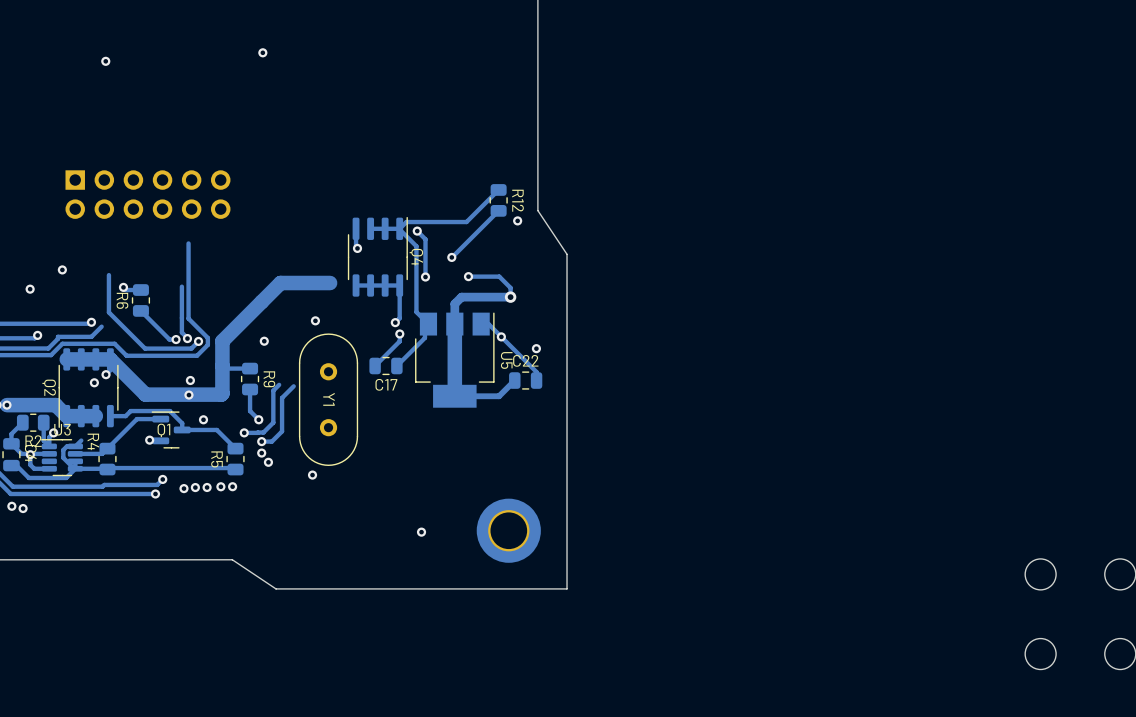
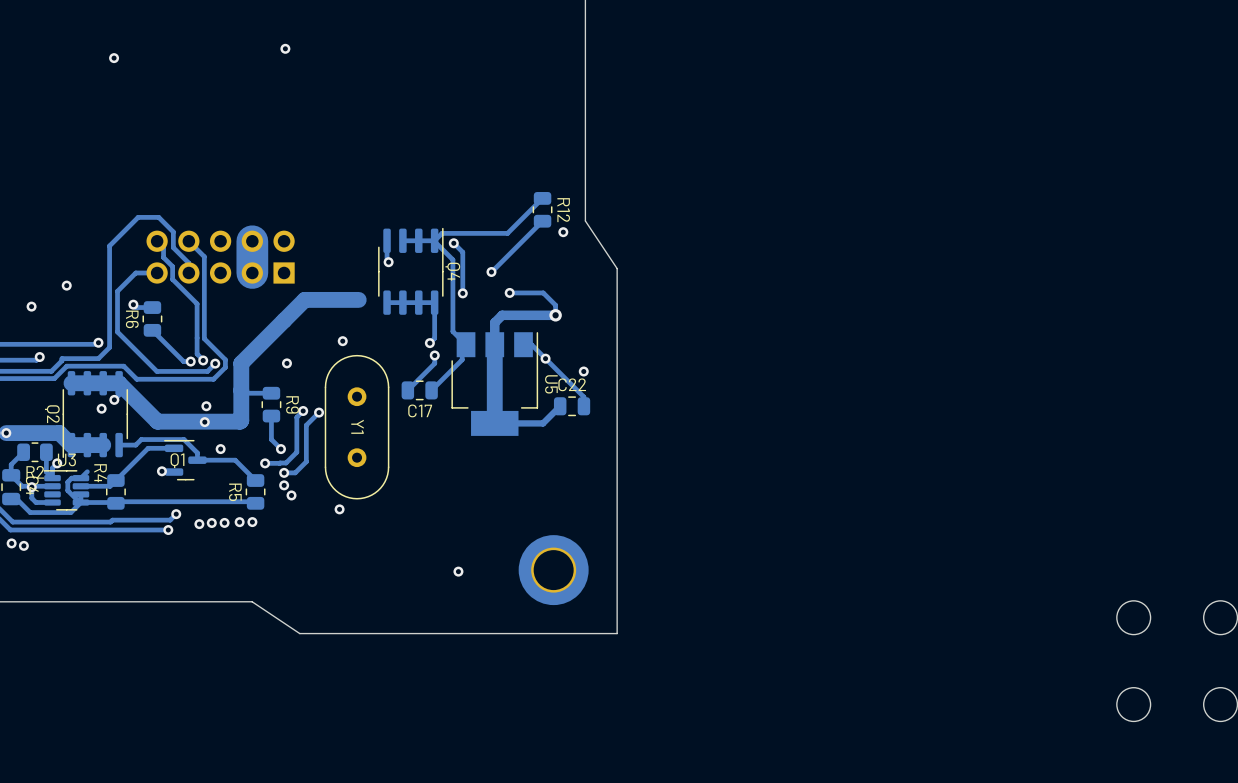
part: (147, 194) -> none
track: none -> (157, 241) (163, 247) (163, 257) (172, 266) (172, 279) (197, 303)
track: none -> (188, 241) (204, 256)
track: none -> (252, 241) (252, 272)
part: none -> (220, 257)
track: none -> (157, 272) (135, 272) (117, 291)
track: none -> (188, 272) (188, 263) (173, 247) (173, 231) (158, 217) (138, 217) (109, 245) (109, 347)
via: none -> (303, 410)
via: none -> (319, 412)

